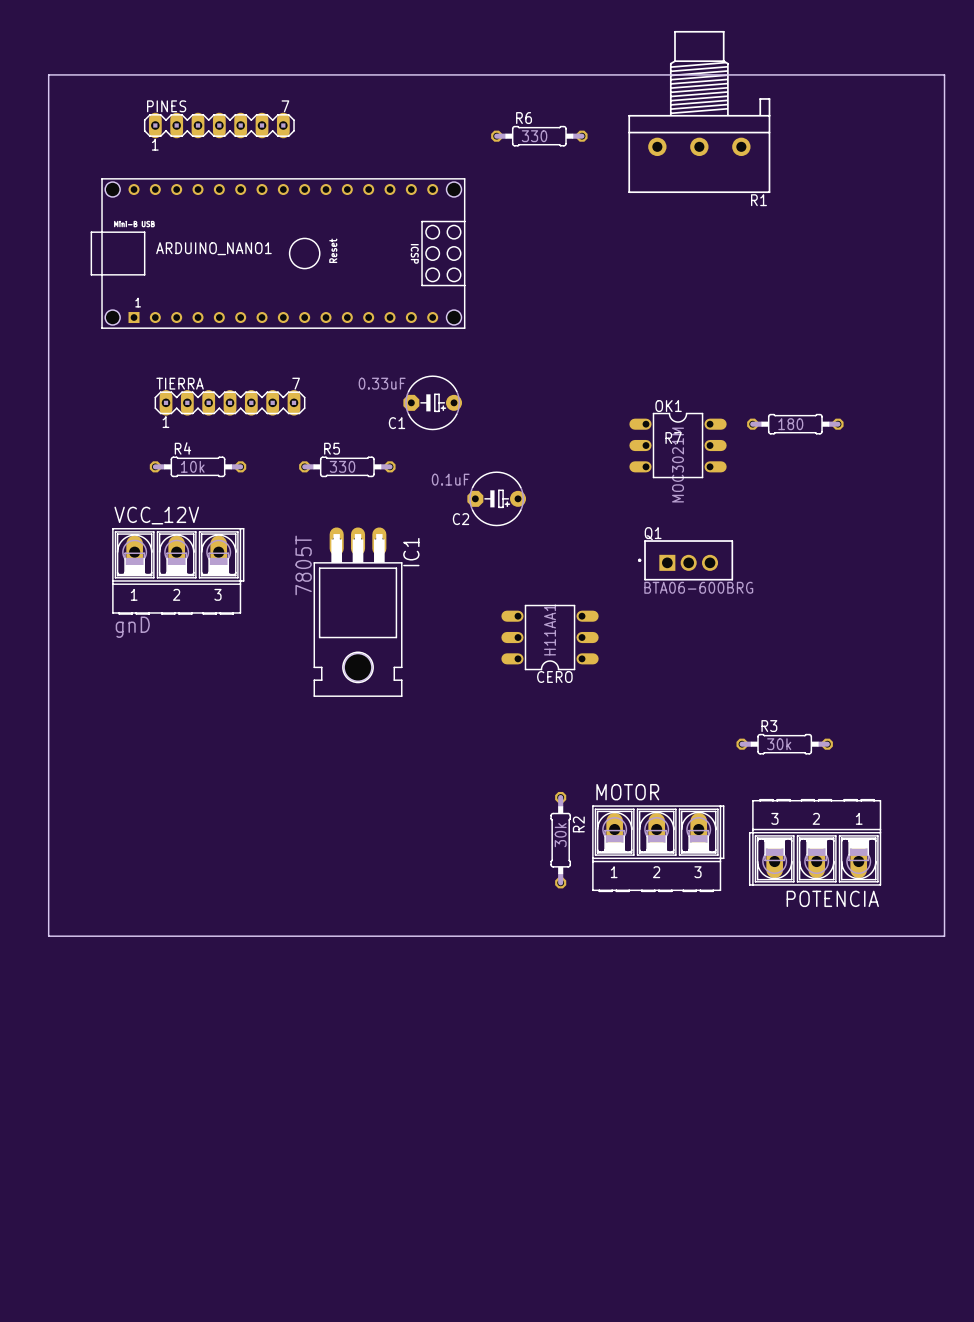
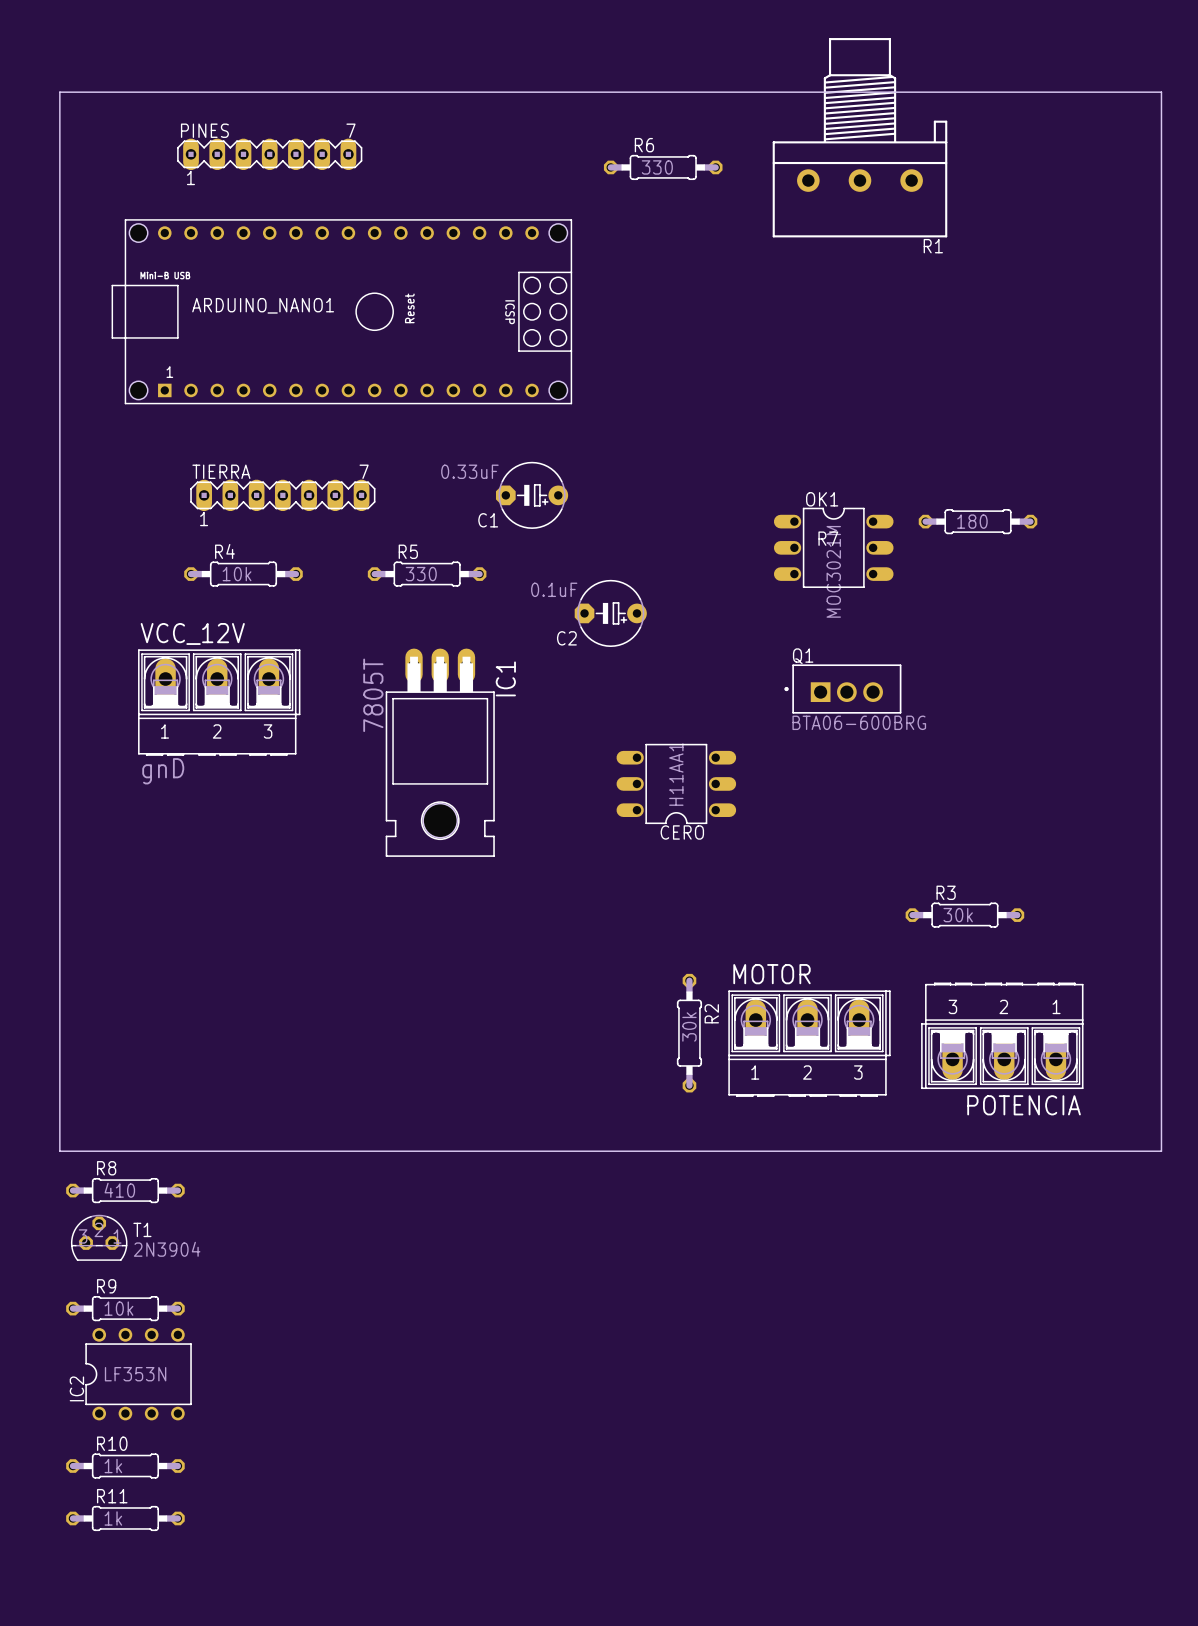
R8: none -> 410 (125, 1190)
T1: none -> 2N3904 (99, 1237)
R9: none -> 10k (125, 1308)
IC2: none -> LF353N (138, 1374)
R10: none -> 1k (125, 1466)
R11: none -> 1k (125, 1518)

